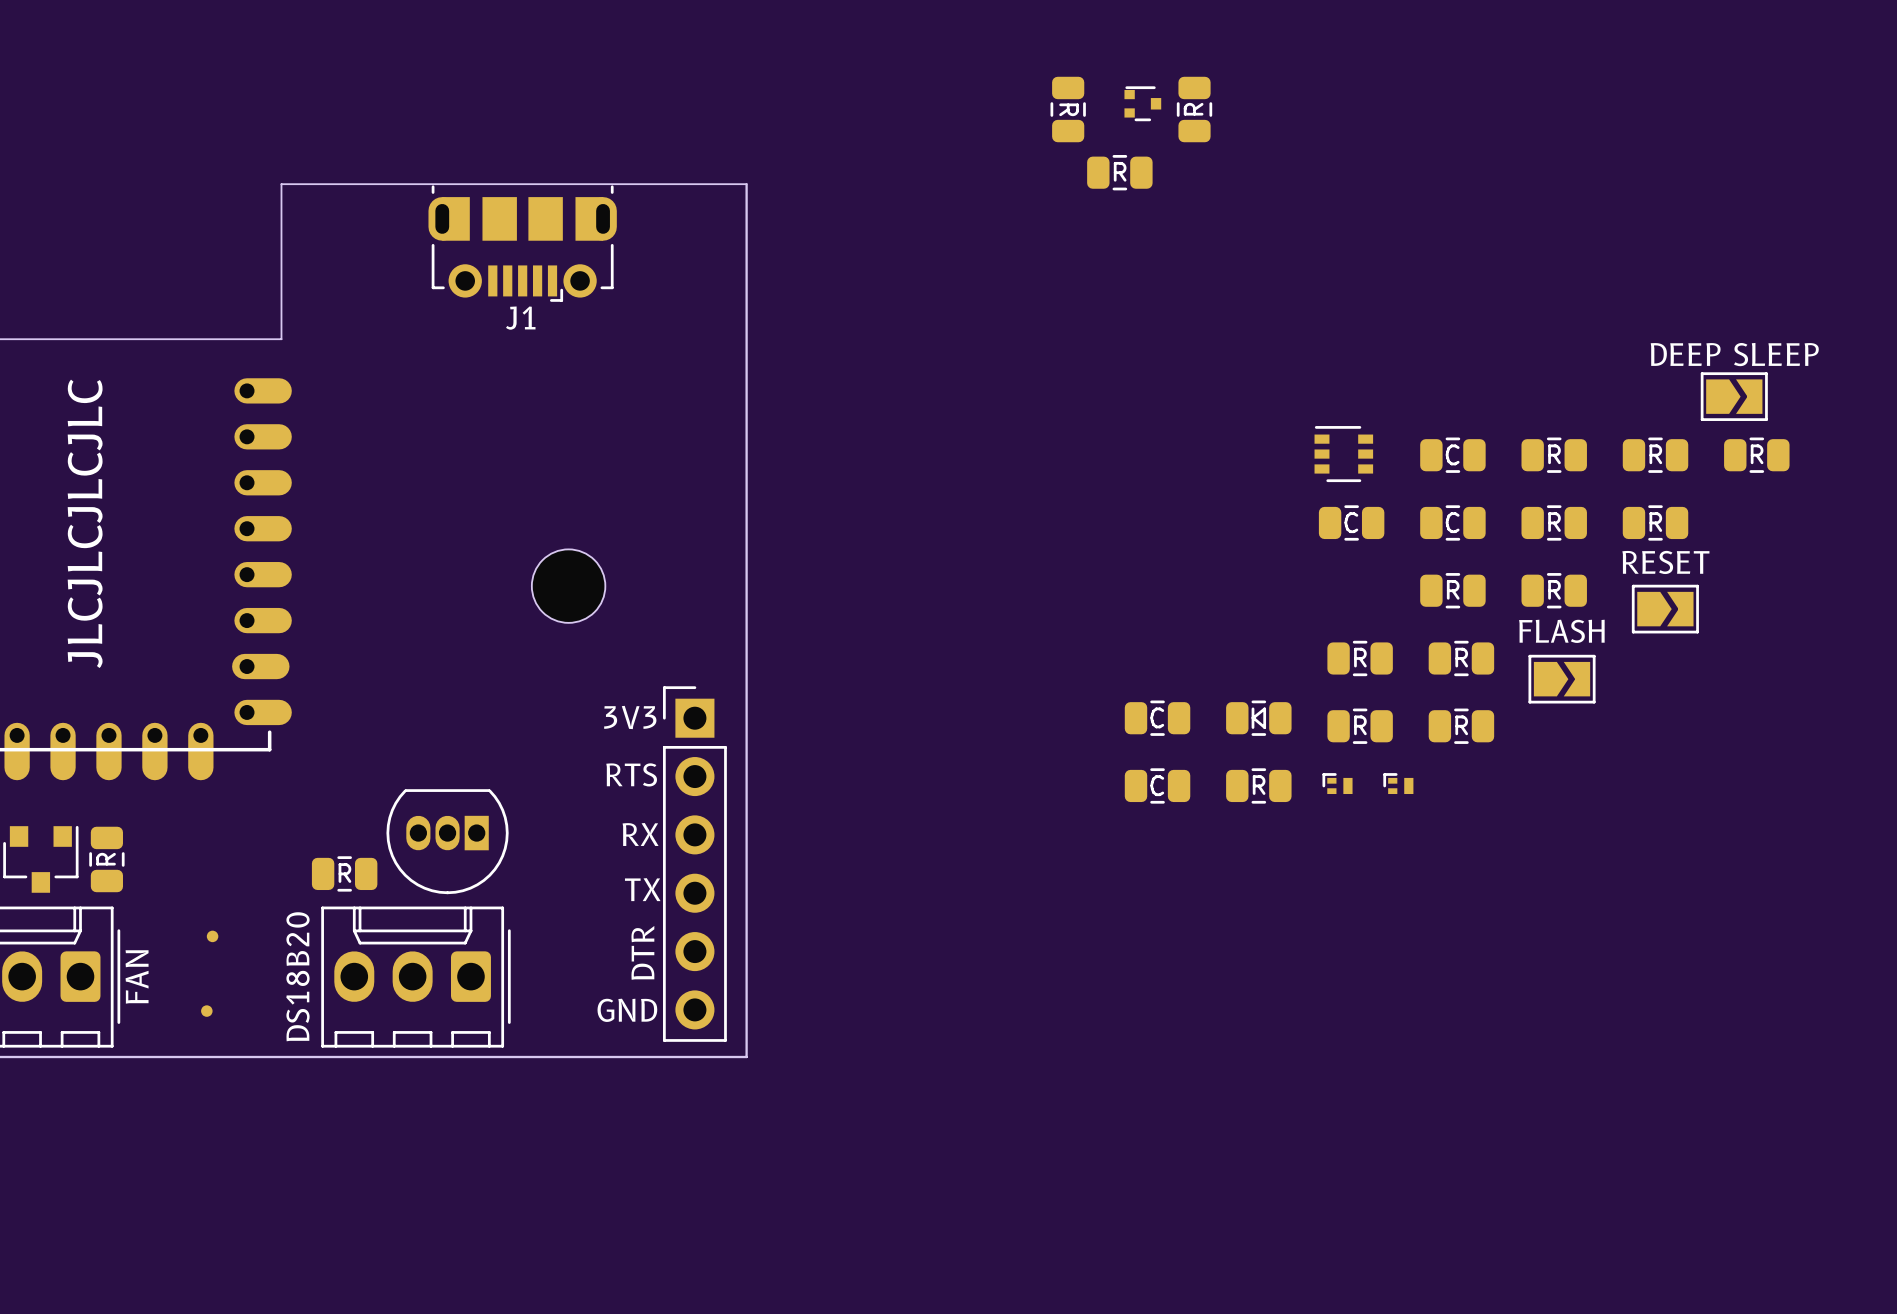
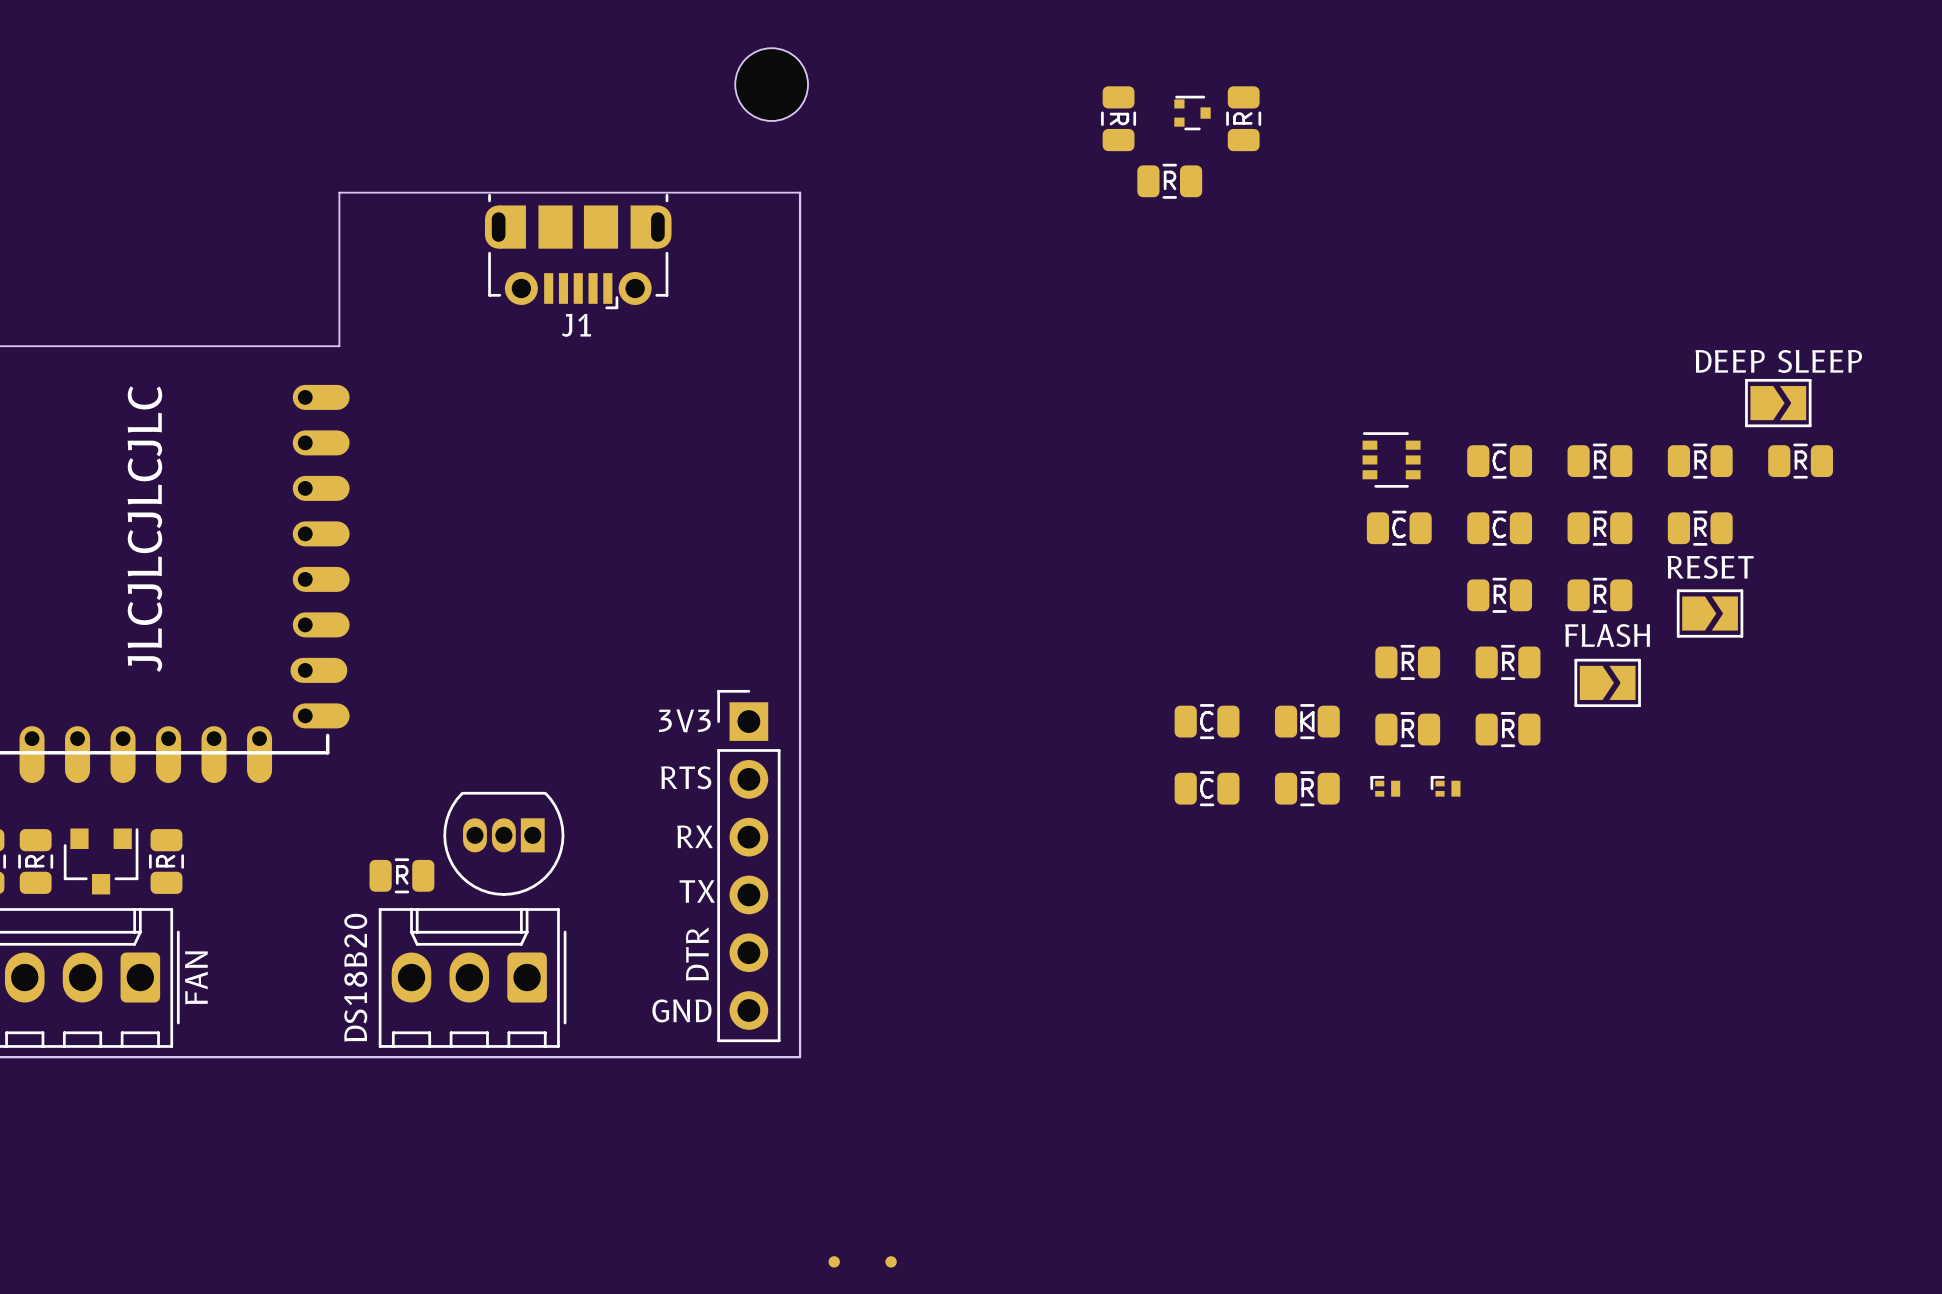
part position: (568, 586) -> (771, 84)
part: (212, 936) -> none
part: (206, 1011) -> none
part: none -> (834, 1261)
part: none -> (891, 1261)

